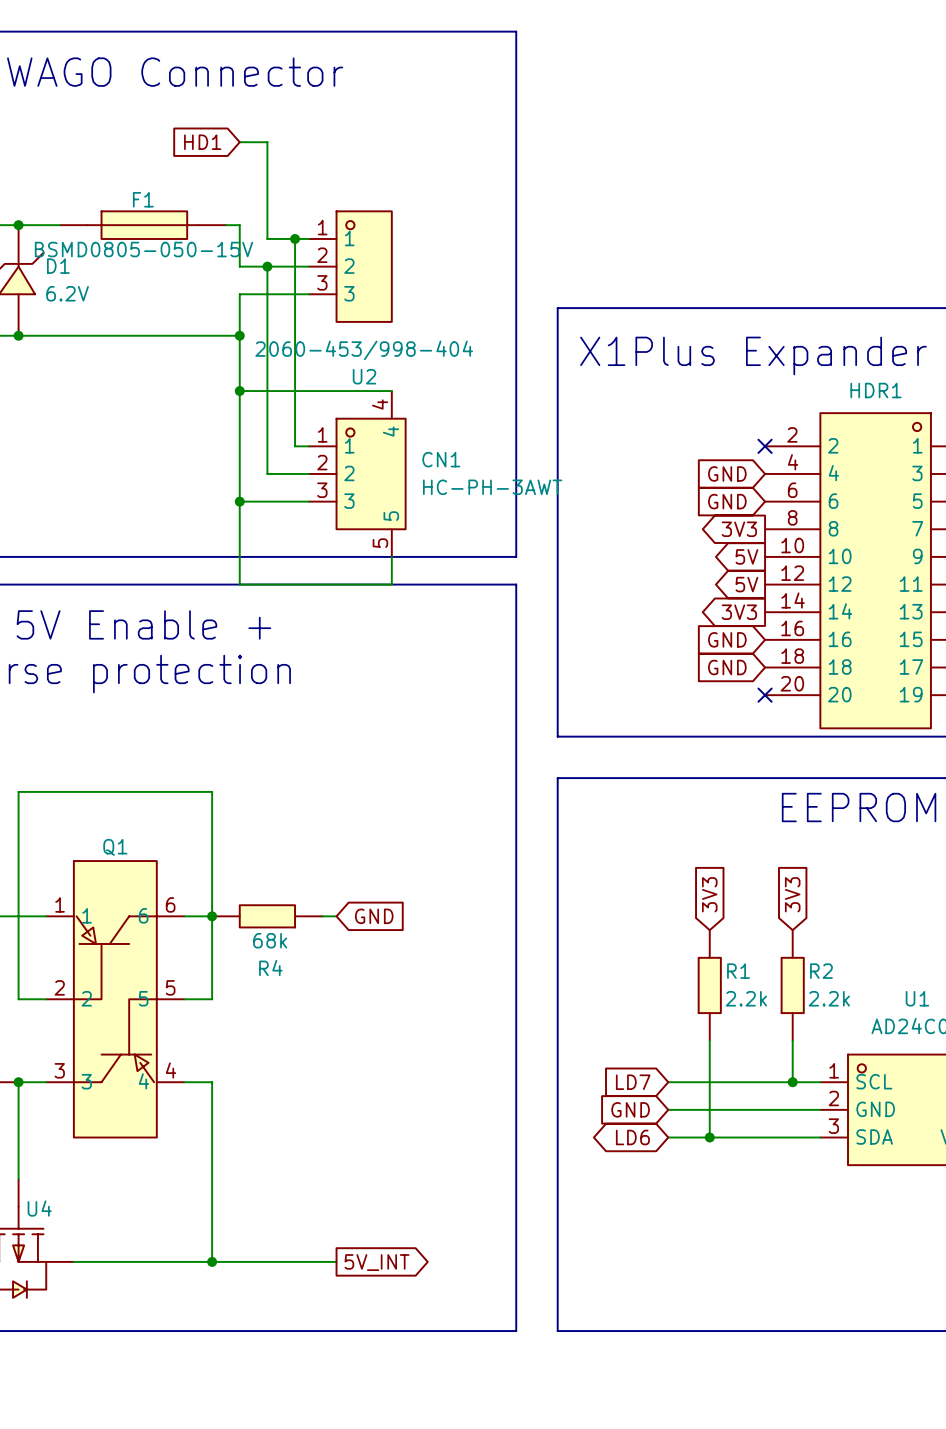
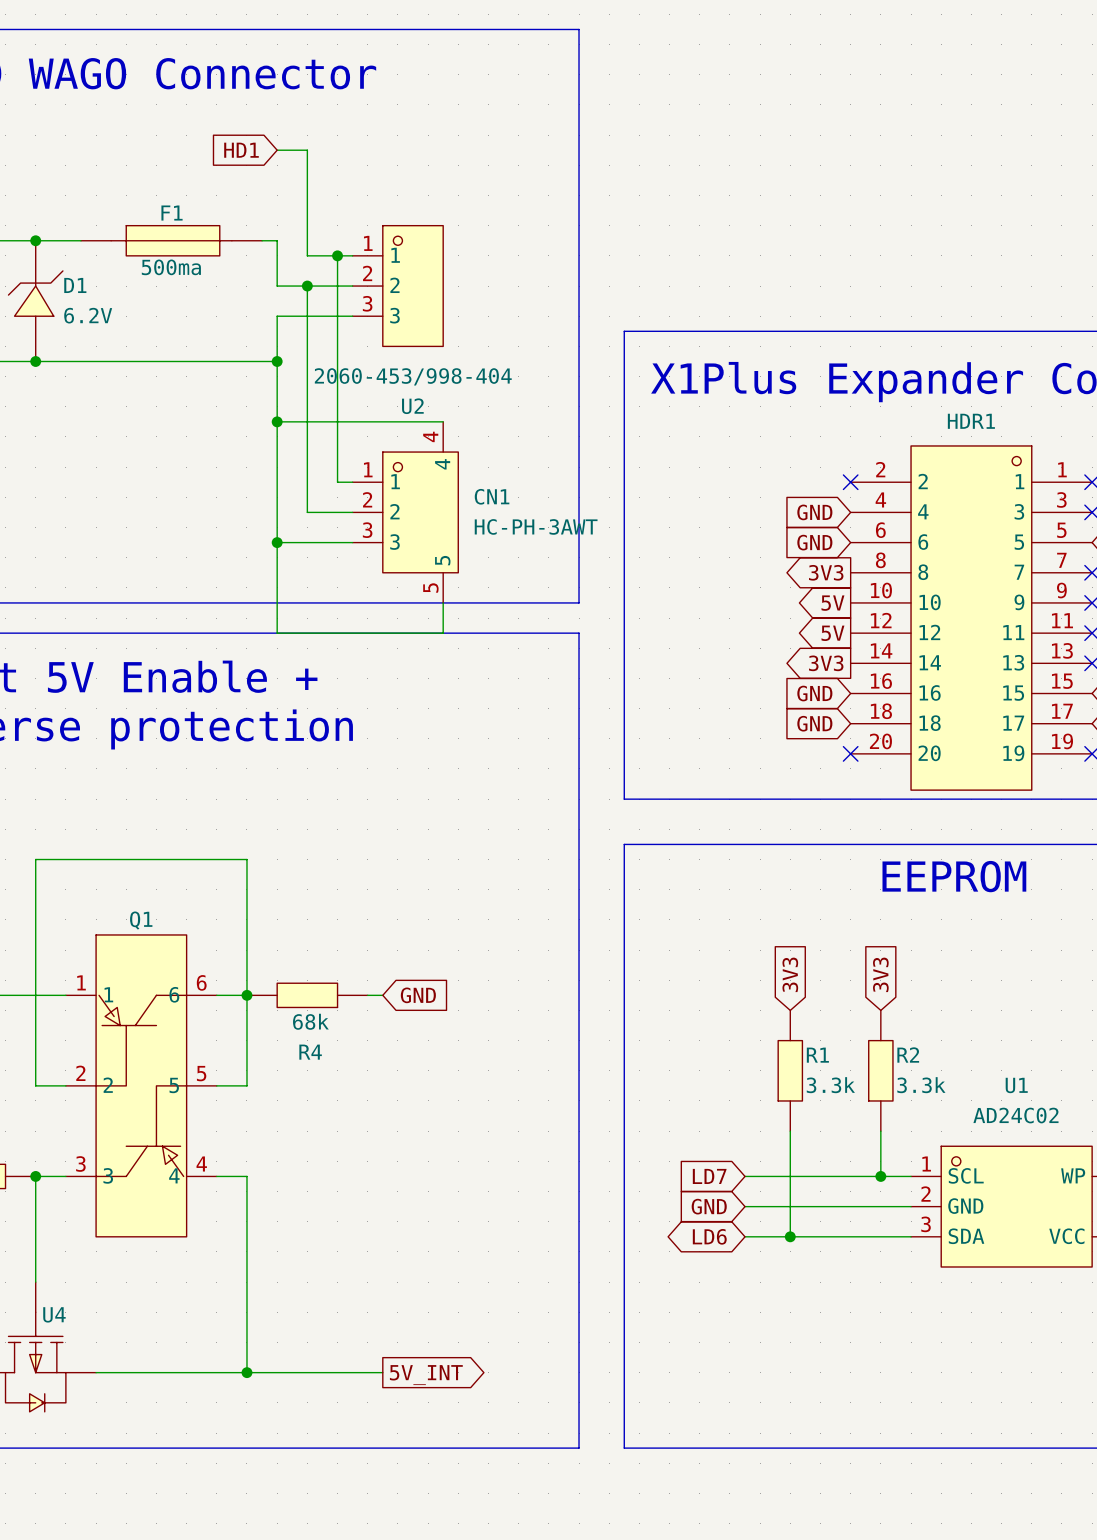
F1 value: BSMD0805-050-15V (143, 249) -> 500ma (171, 267)
R1 value: 2.2k (746, 998) -> 3.3k (830, 1085)
R2 value: 2.2k (829, 998) -> 3.3k (921, 1085)

